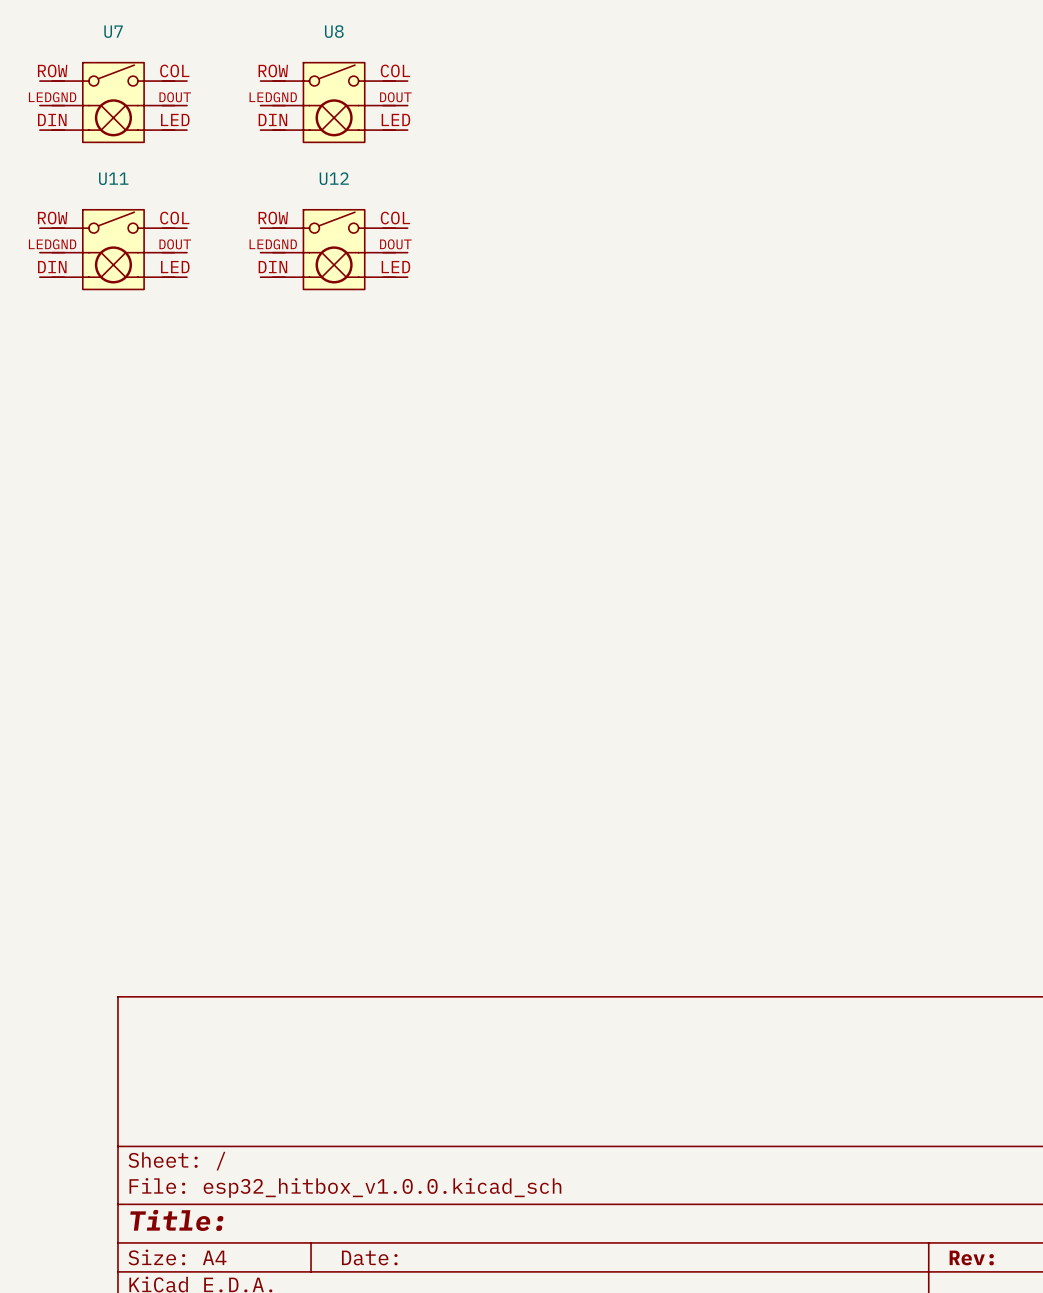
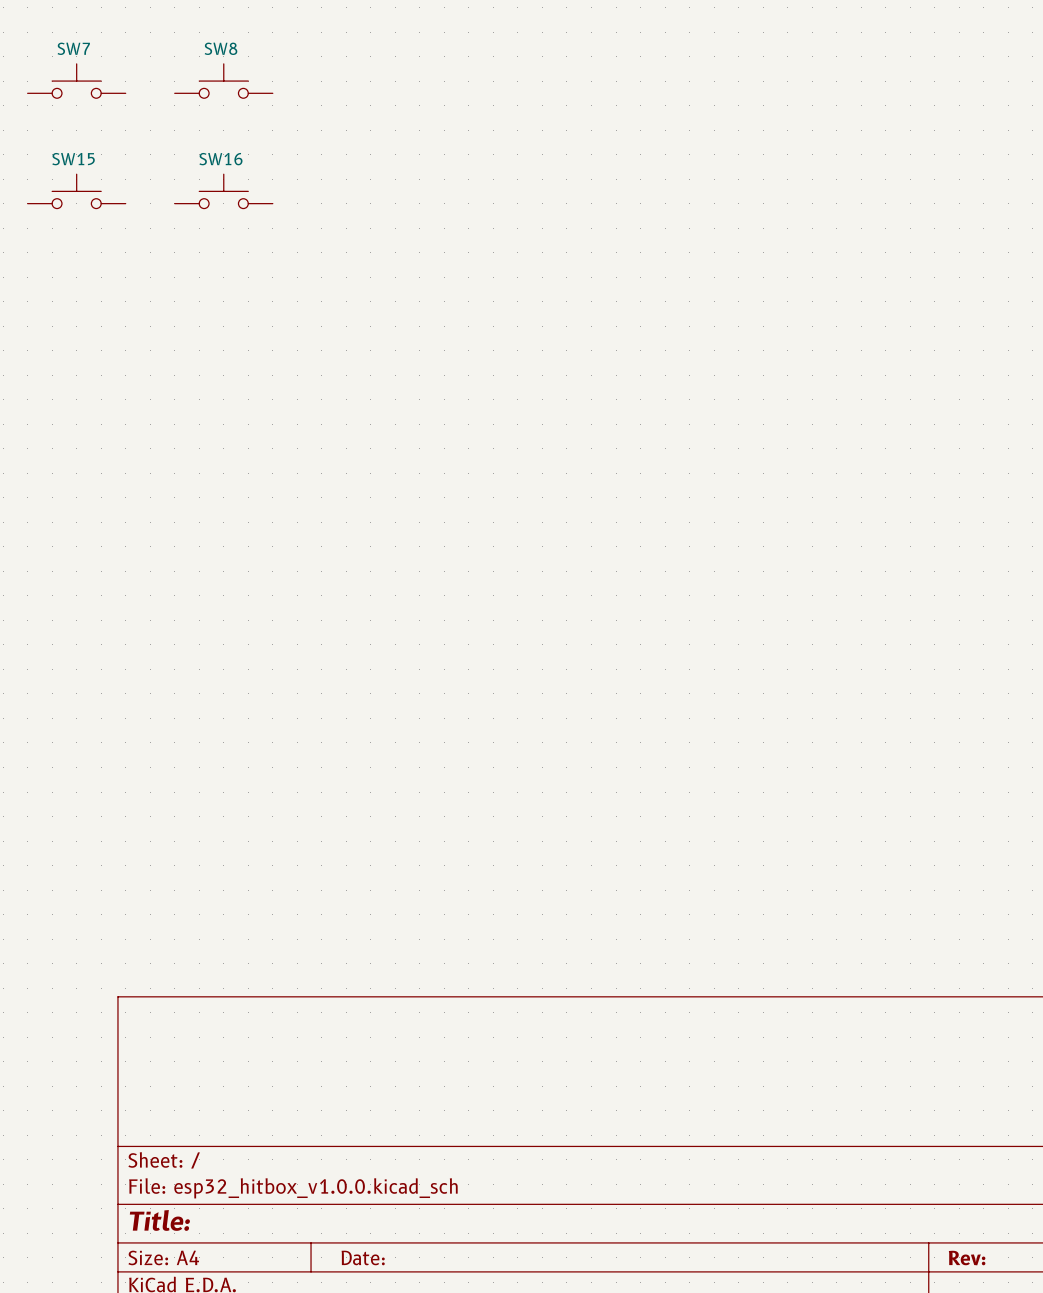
SW7: none -> (76, 81)
SW8: none -> (223, 81)
U7: (113, 102) -> none
U8: (334, 102) -> none
SW15: none -> (76, 191)
SW16: none -> (223, 191)
U11: (113, 249) -> none
U12: (334, 249) -> none

